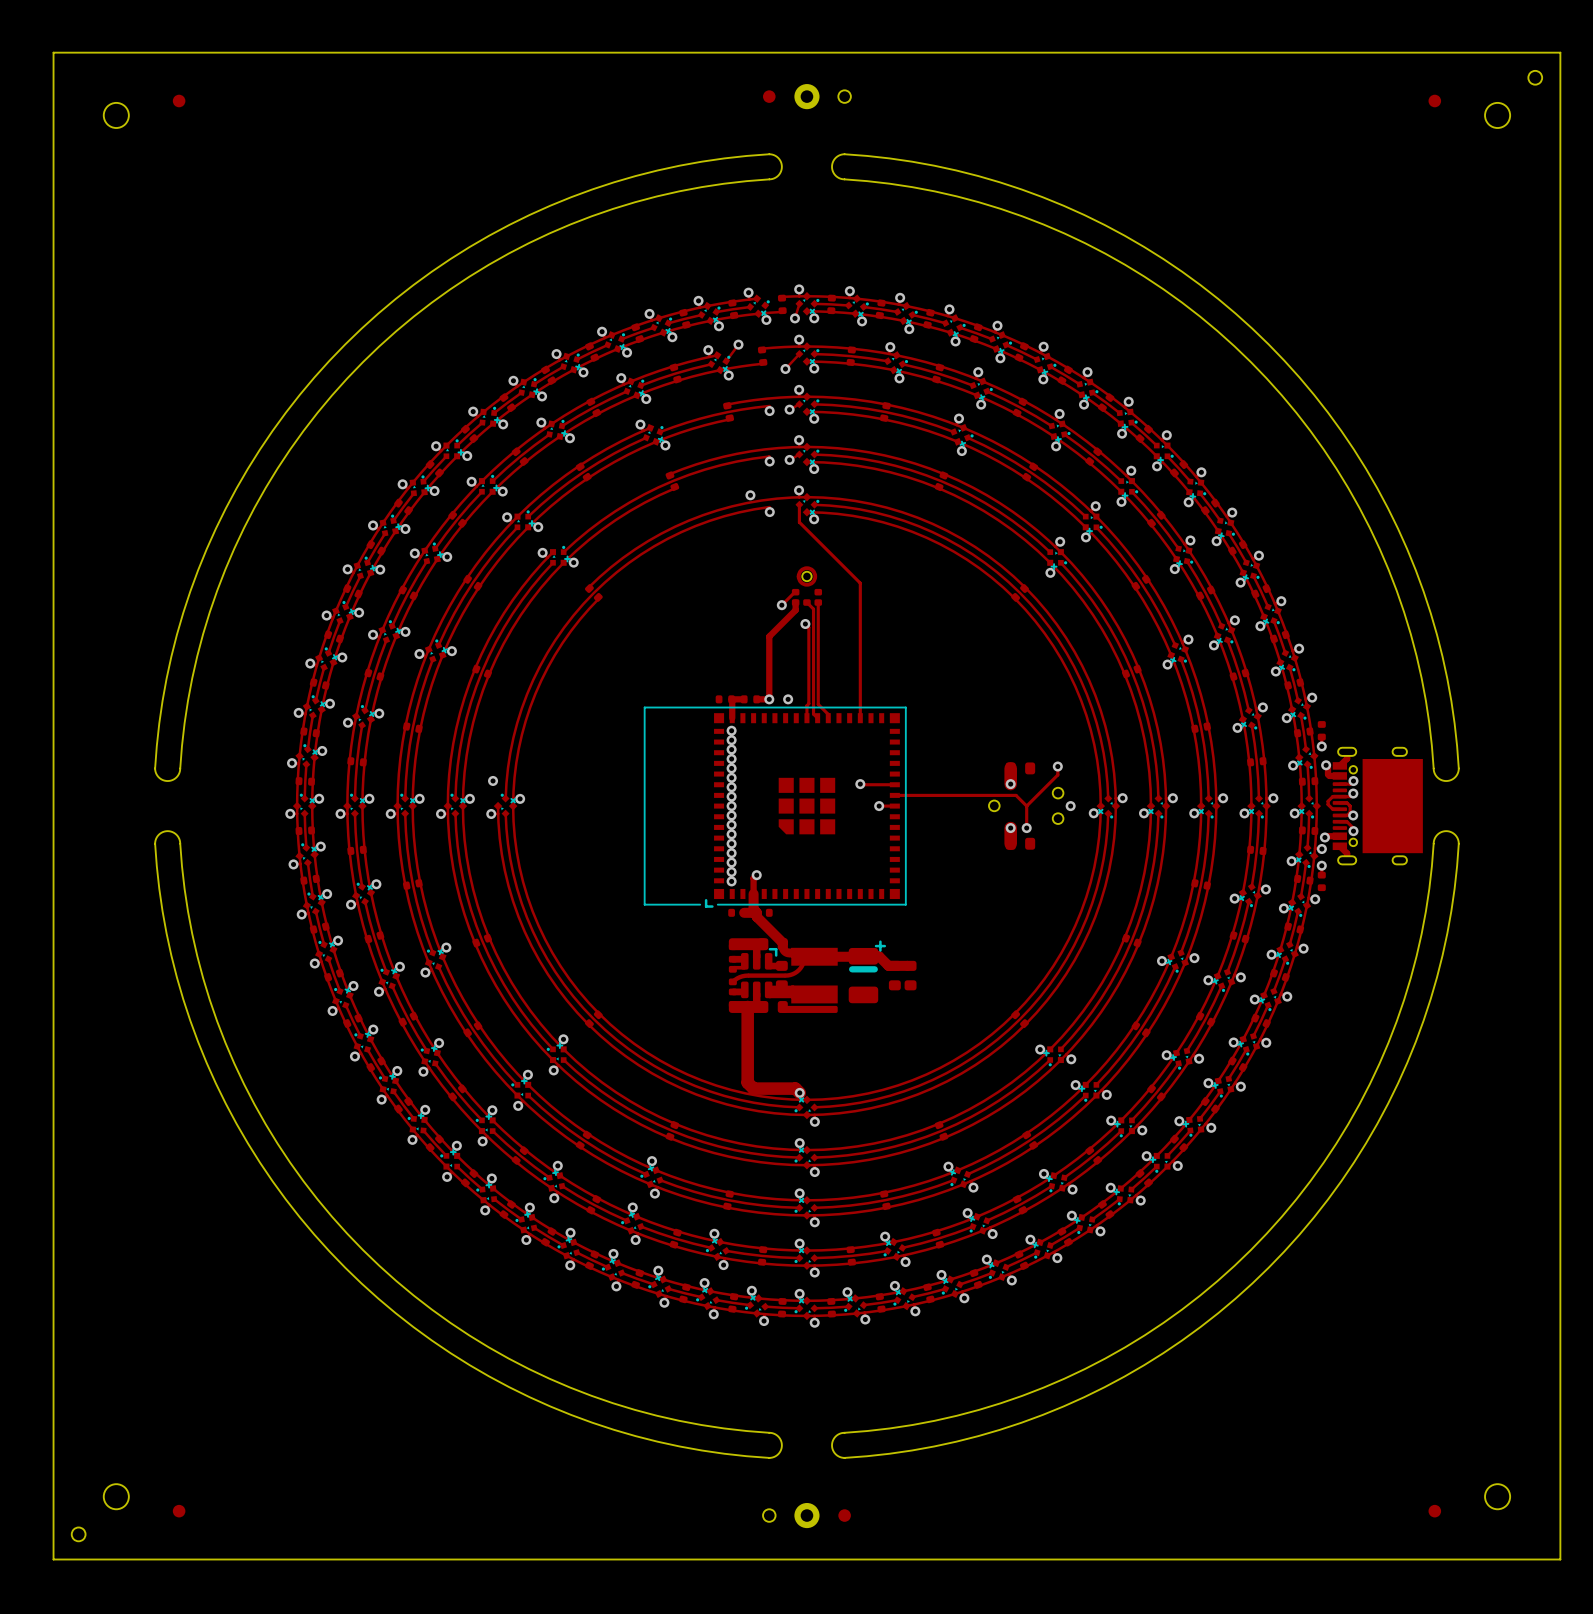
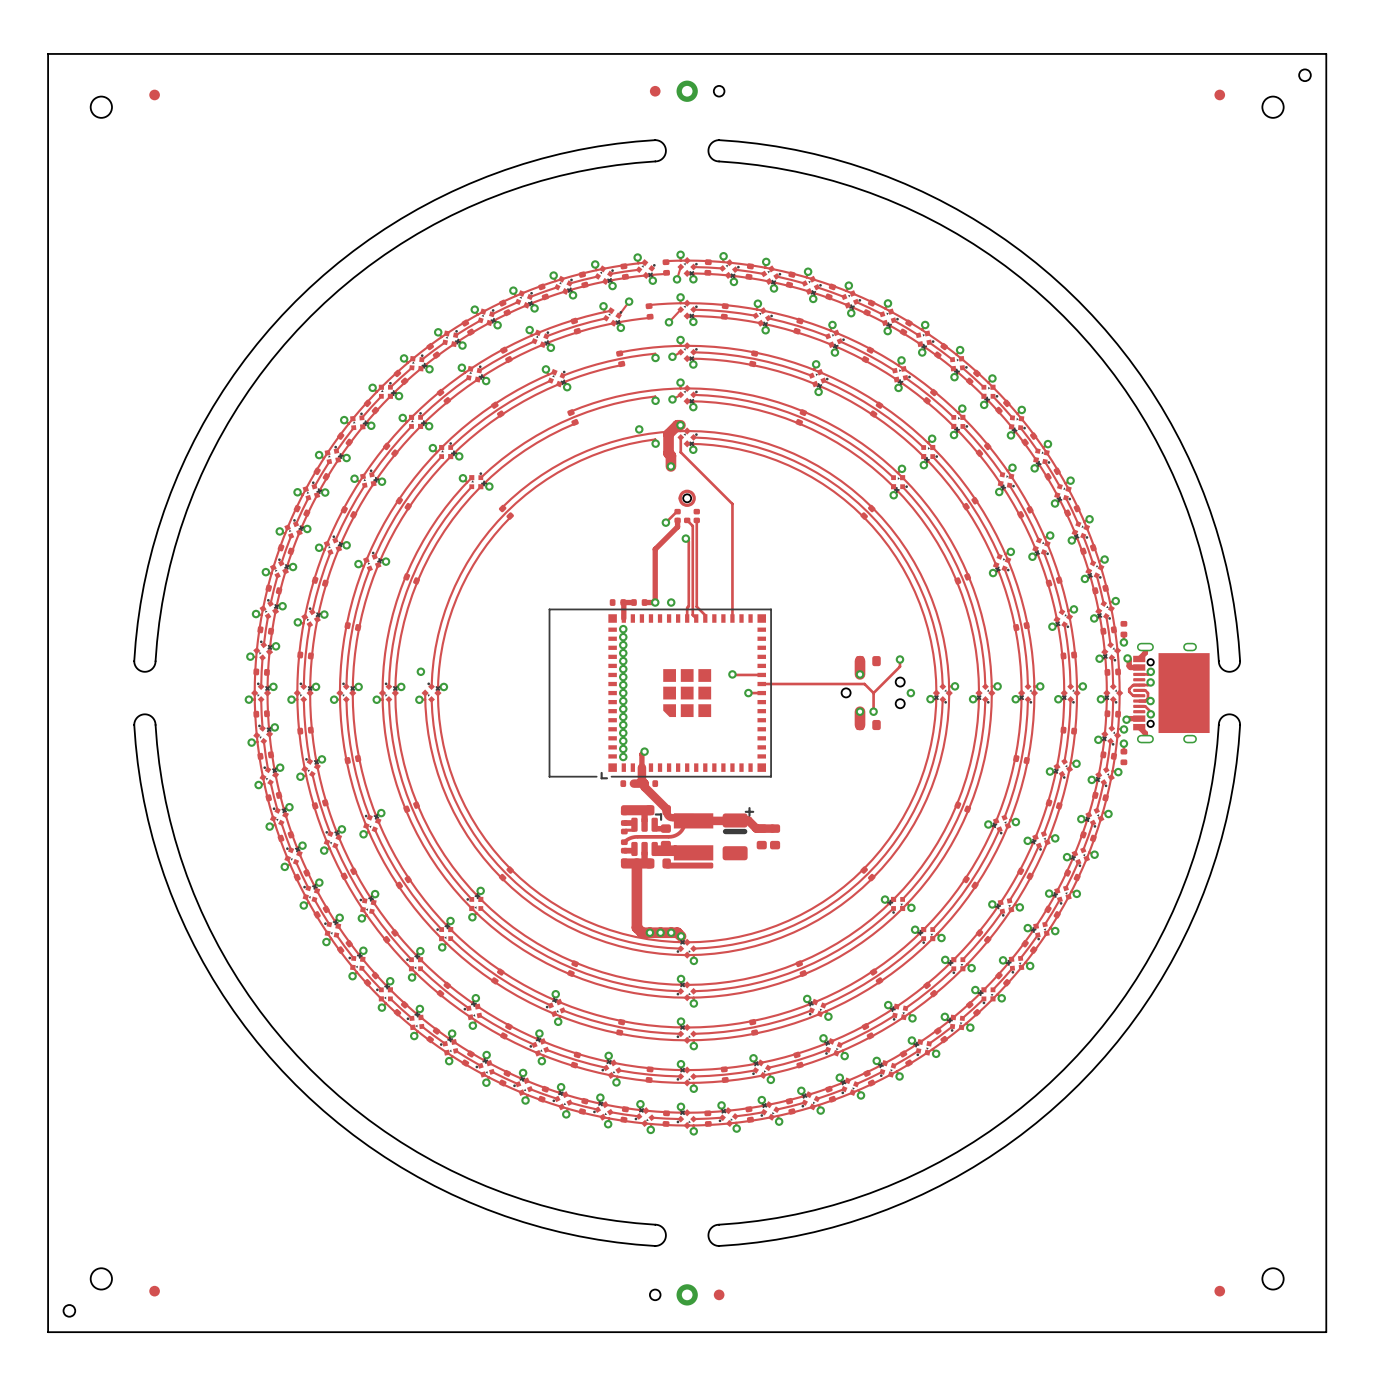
track: none -> (680, 425) (677, 425) (668, 434) (670, 466)
via: none -> (670, 466)
via: none -> (649, 932)
via: none -> (660, 932)
via: none -> (671, 932)

